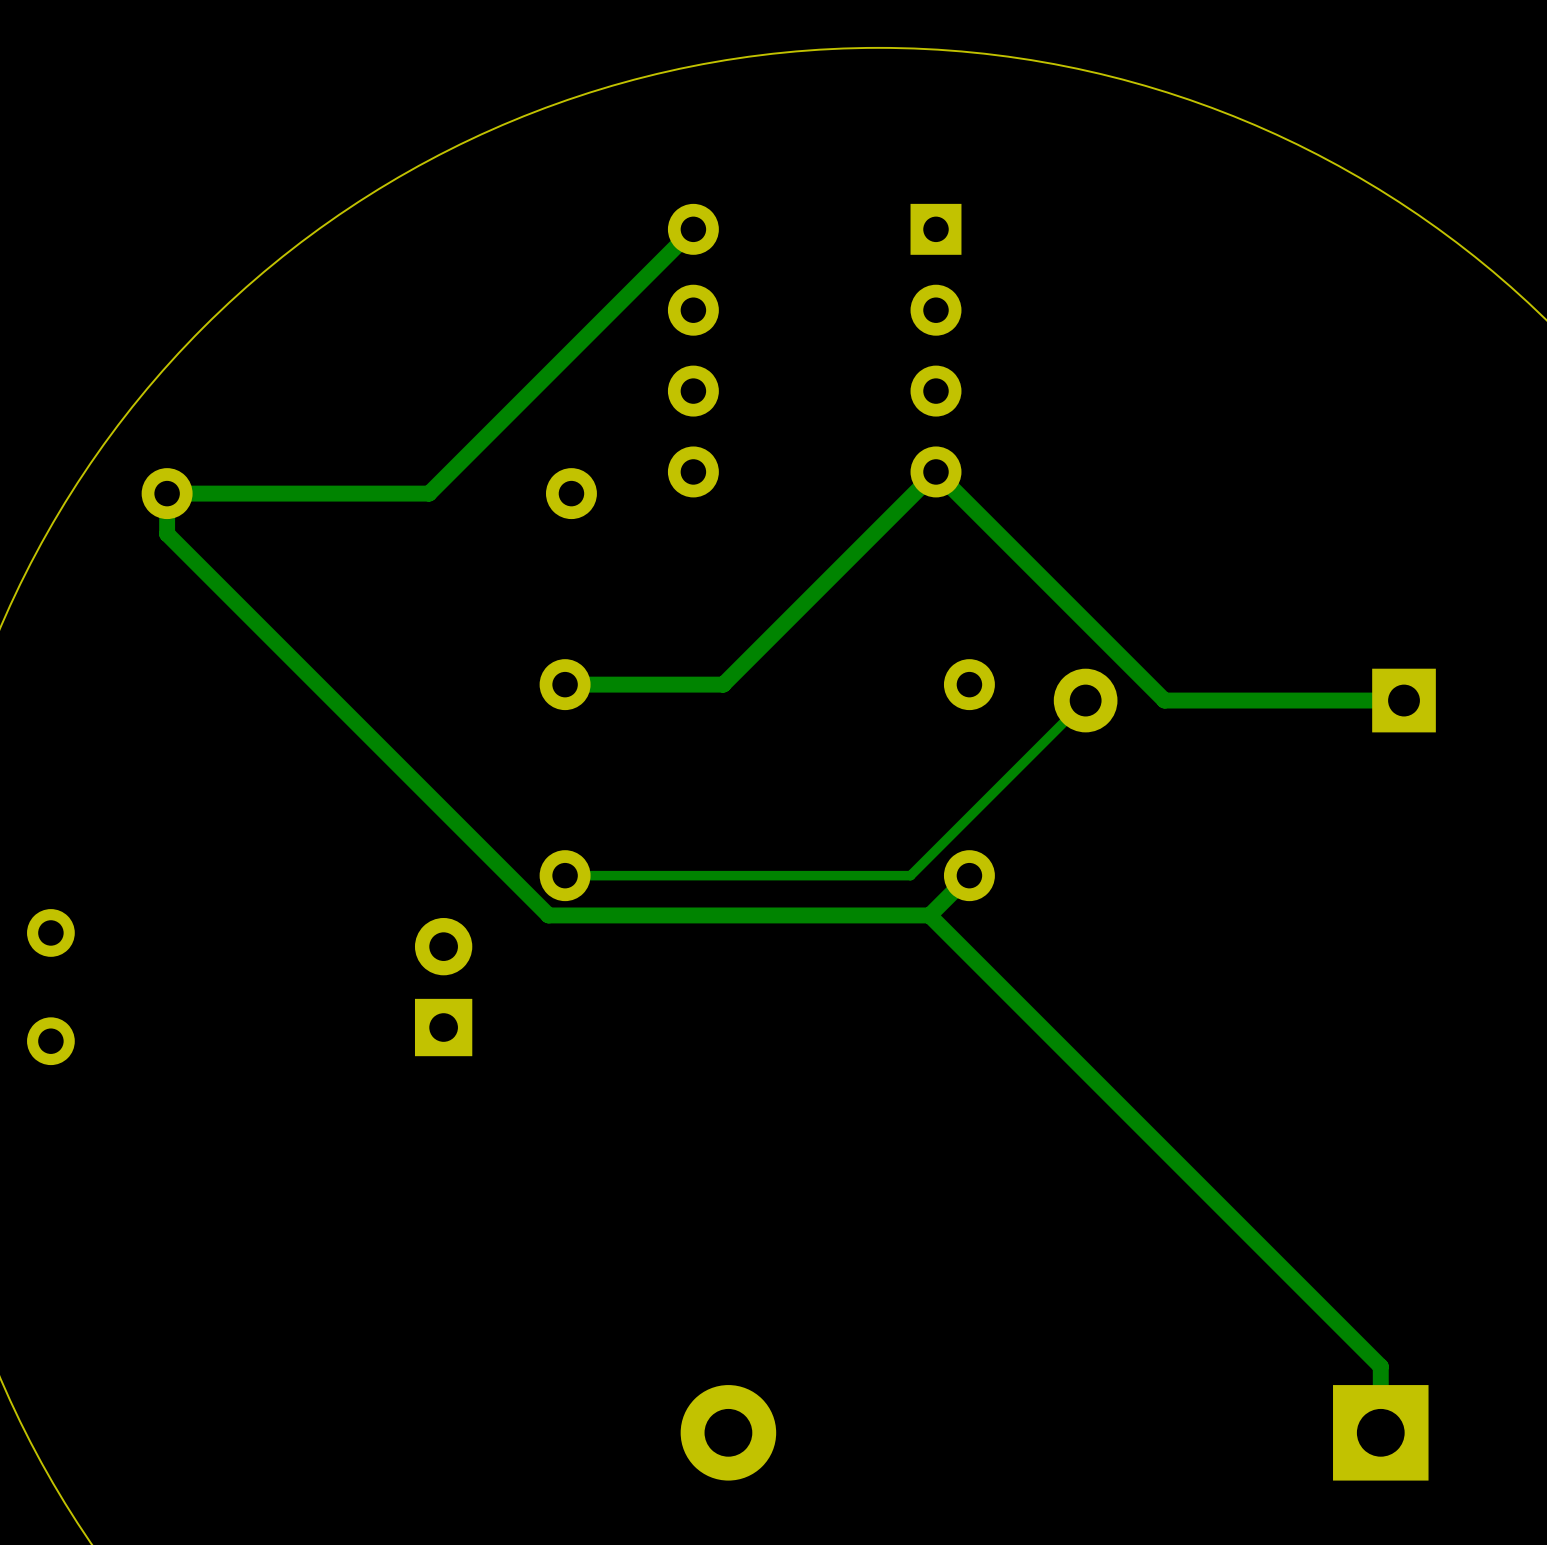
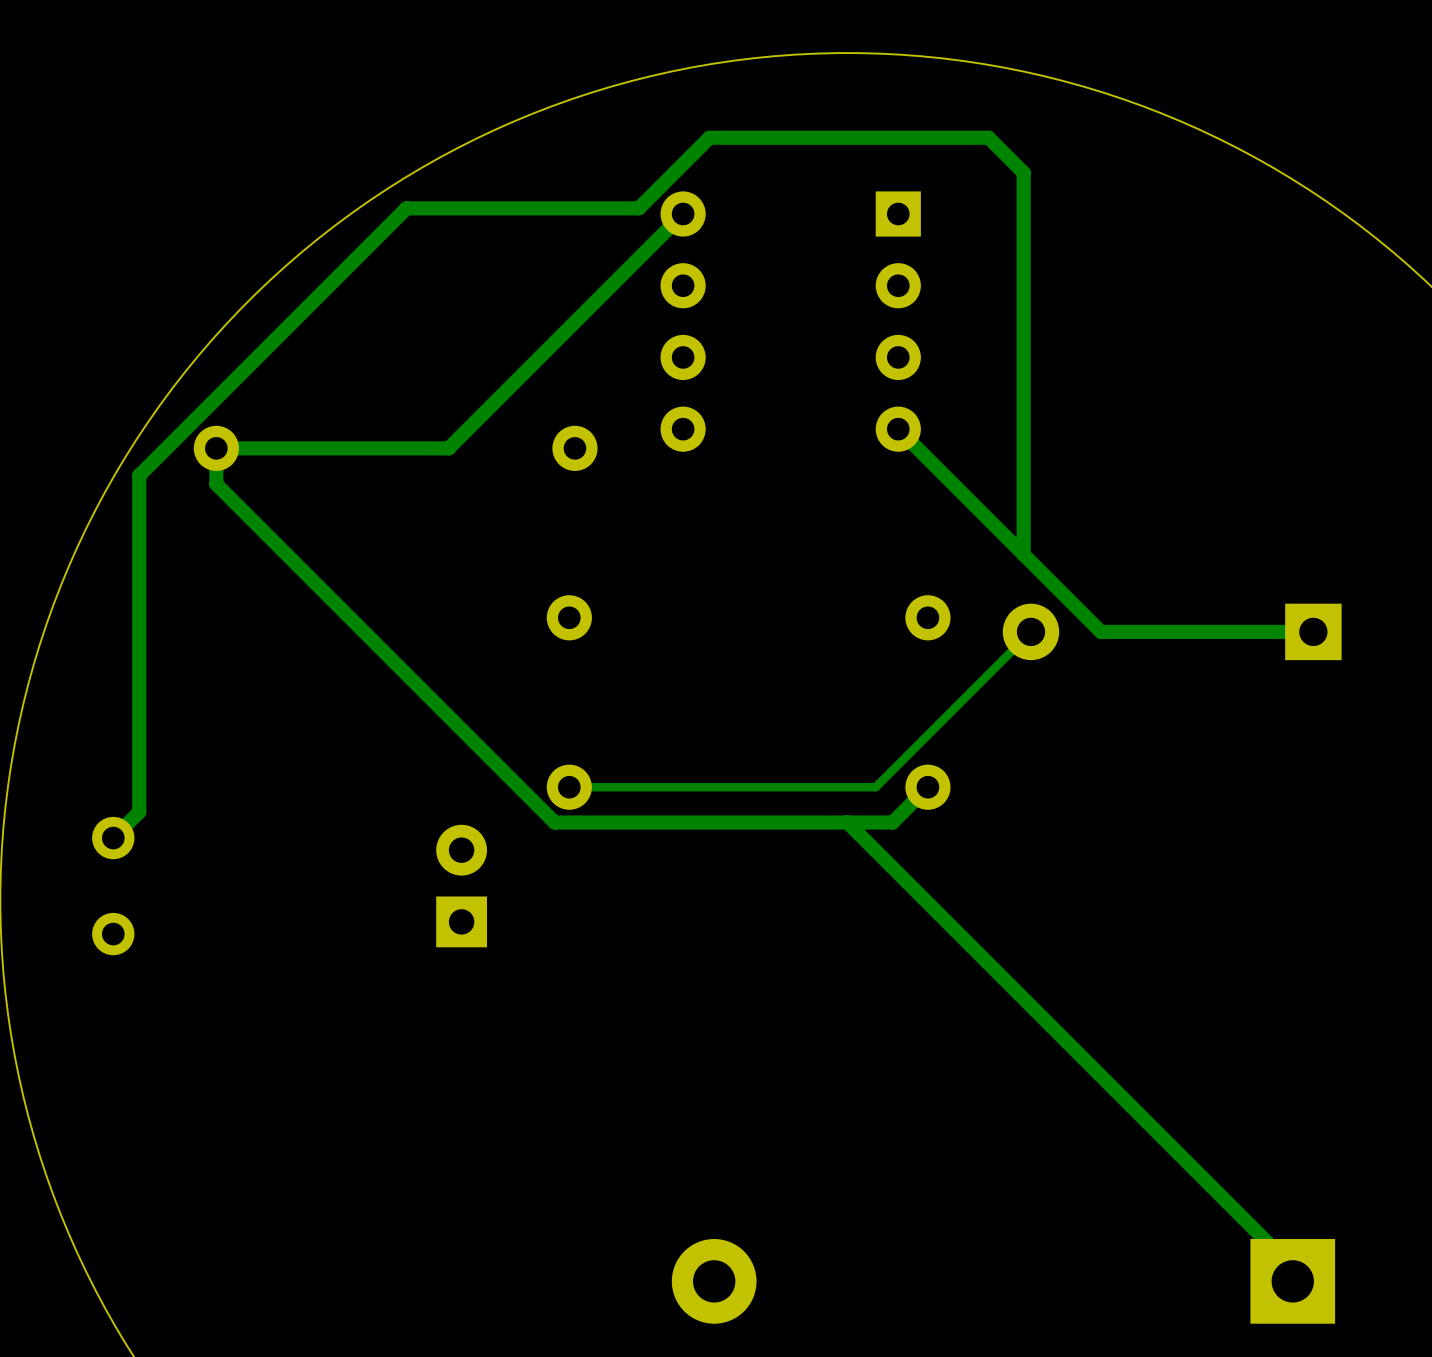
track: (936, 471) (723, 684) (565, 684) -> none
track: none -> (1023, 554) (1023, 172) (988, 137) (709, 137) (638, 208) (406, 208) (139, 475) (139, 812) (113, 838)
track: (929, 915) (1380, 1366) (1380, 1417) -> (847, 822) (1292, 1267)

